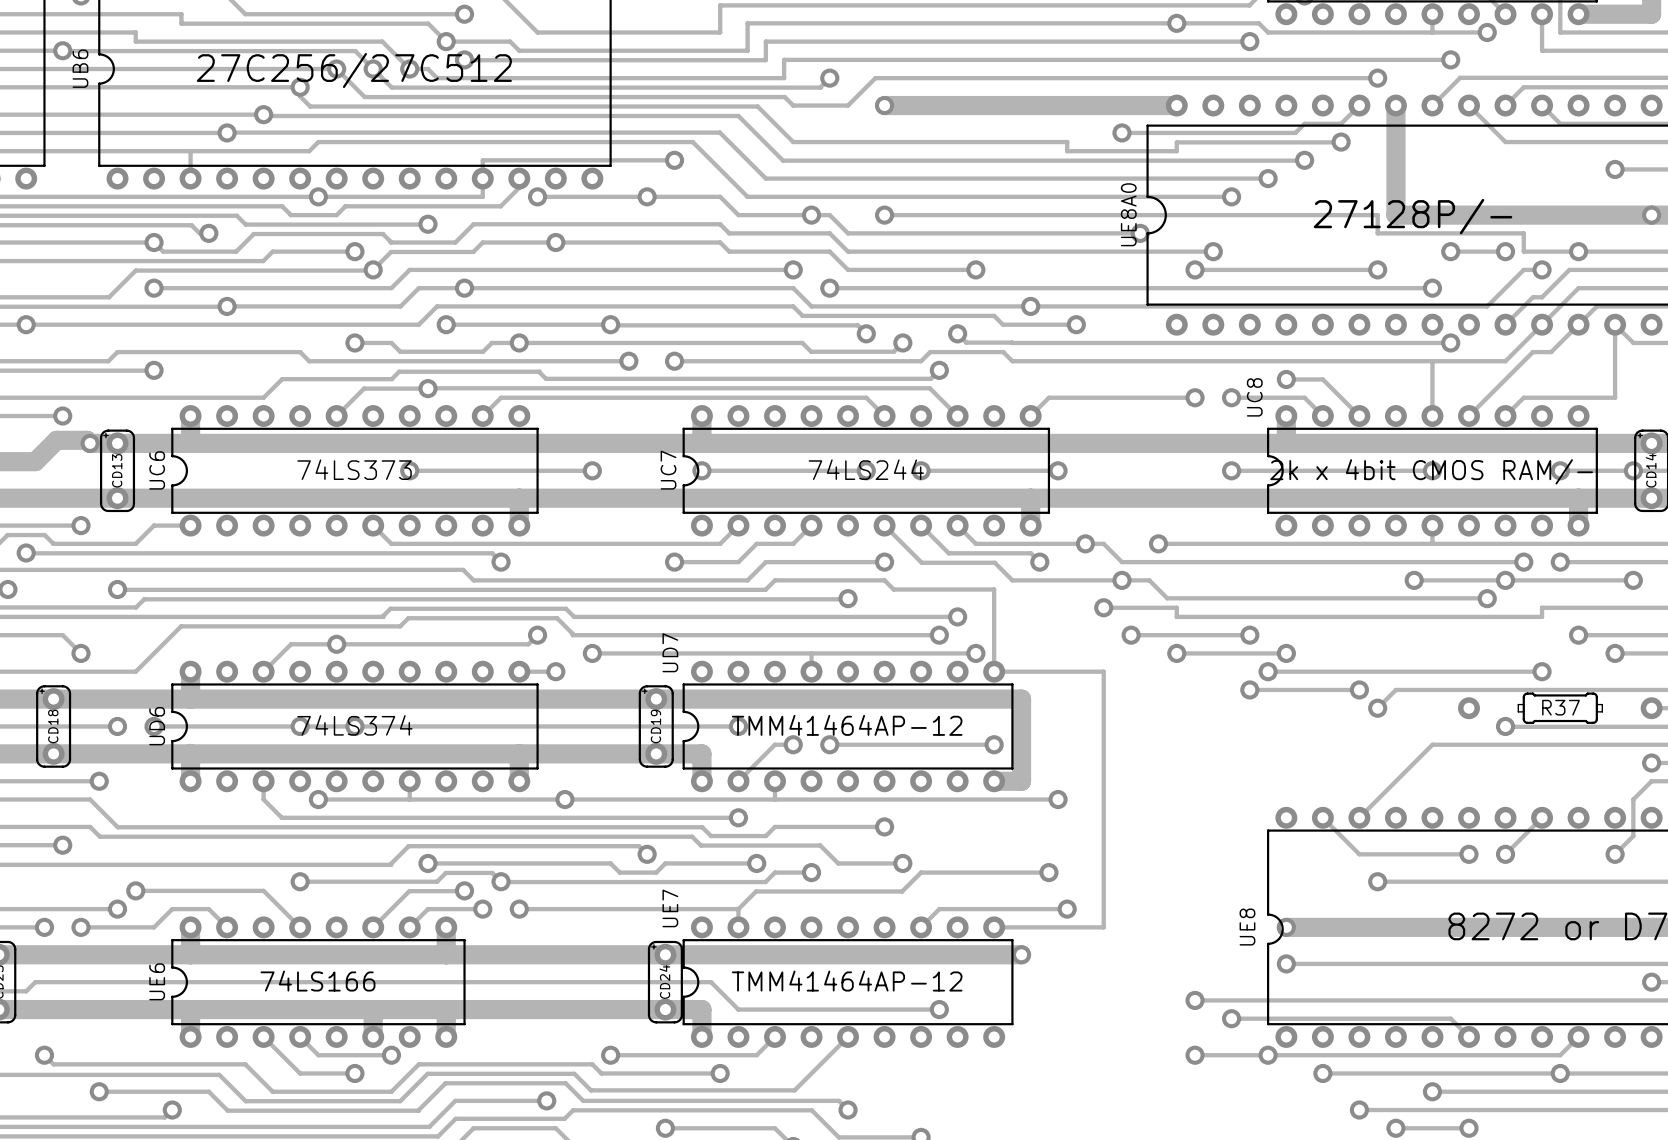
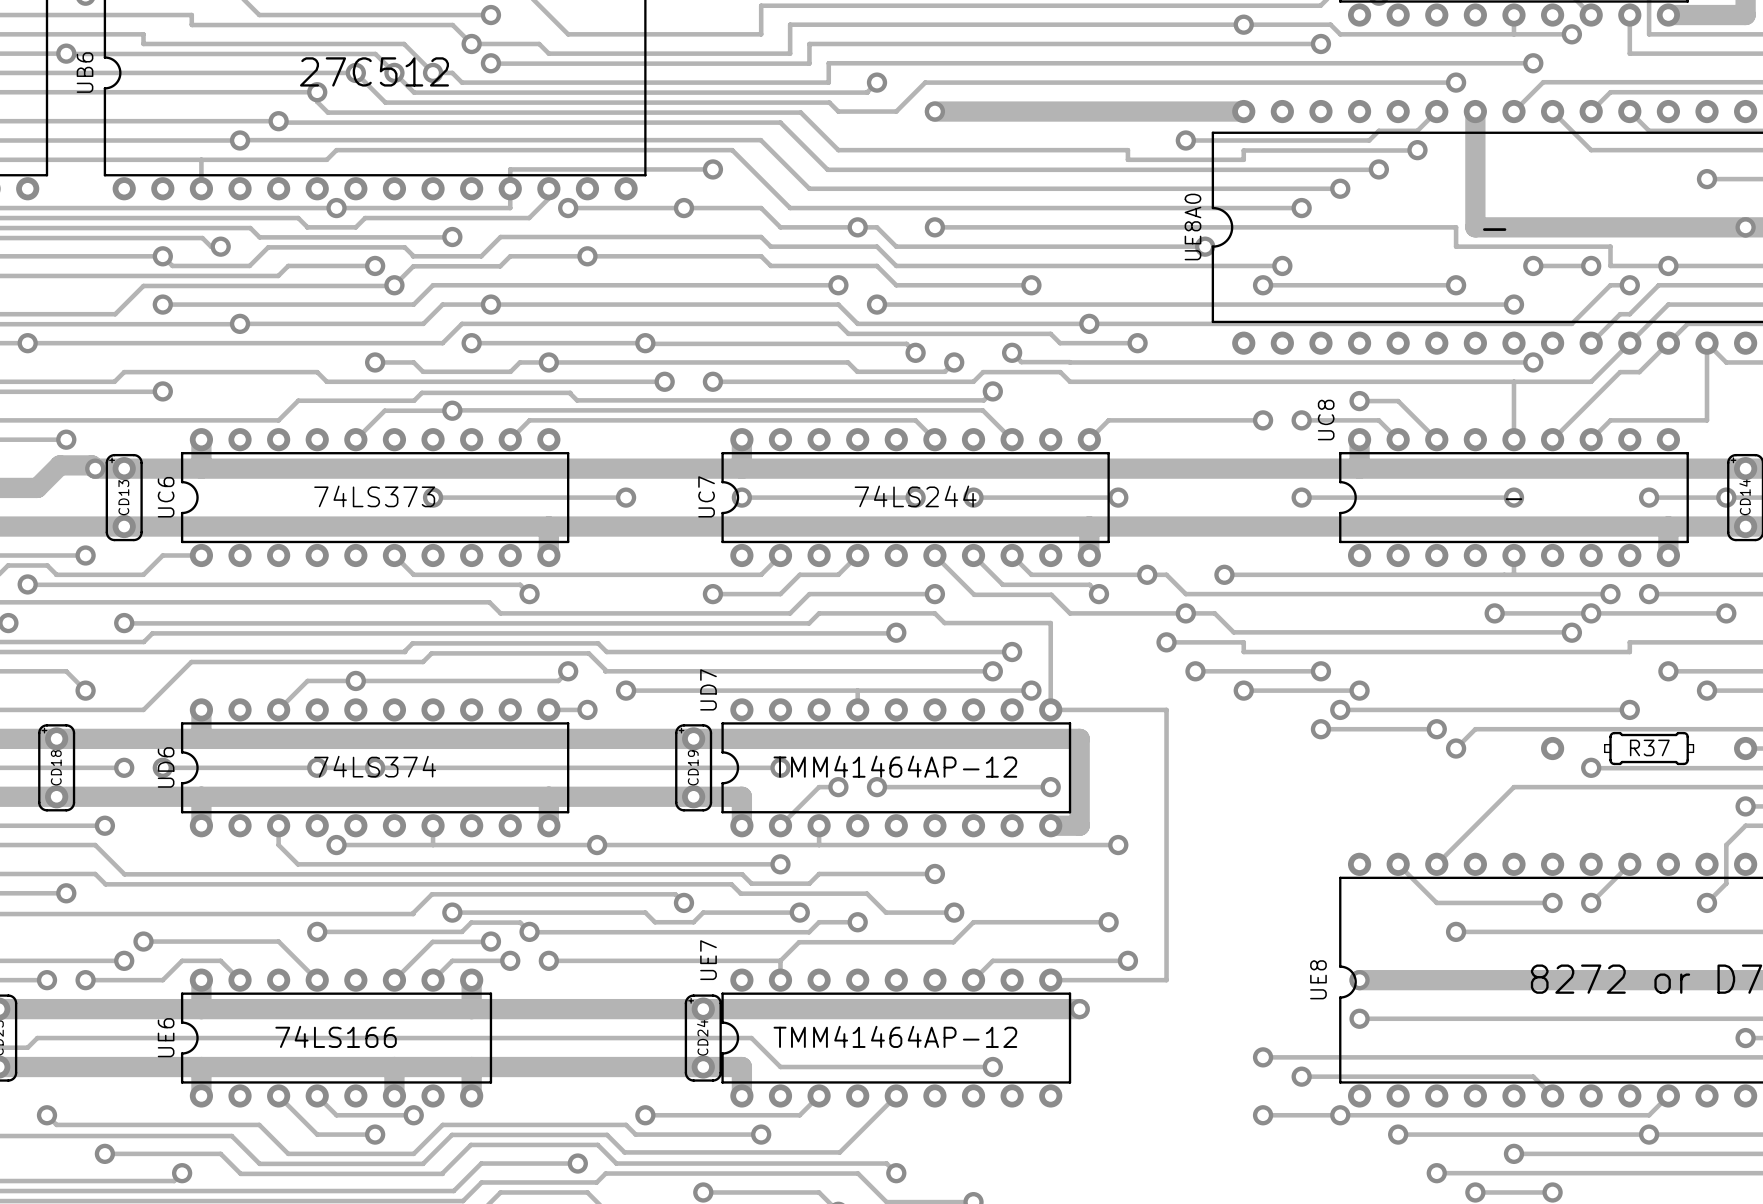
UB6 value: 27C256/27C512 (354, 70) -> 27C512 (374, 71)
UE8A0 value: 27128P/- (1412, 216) -> - (1494, 229)
UC8 value: 2k x 4bit CMOS RAM/- (1431, 471) -> - (1513, 499)

